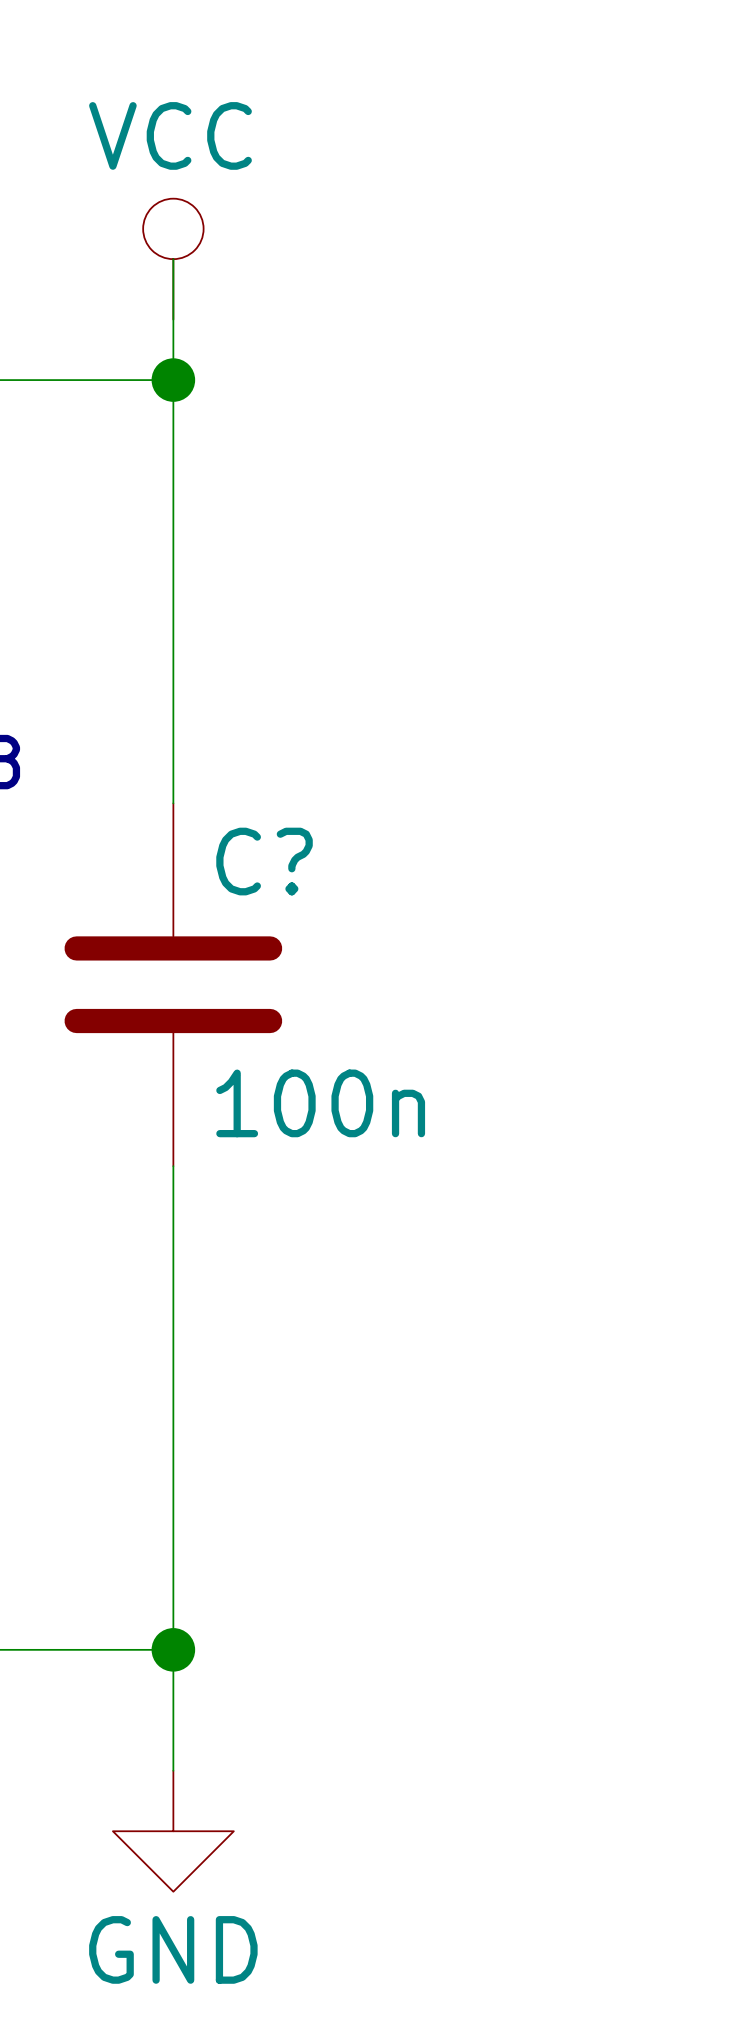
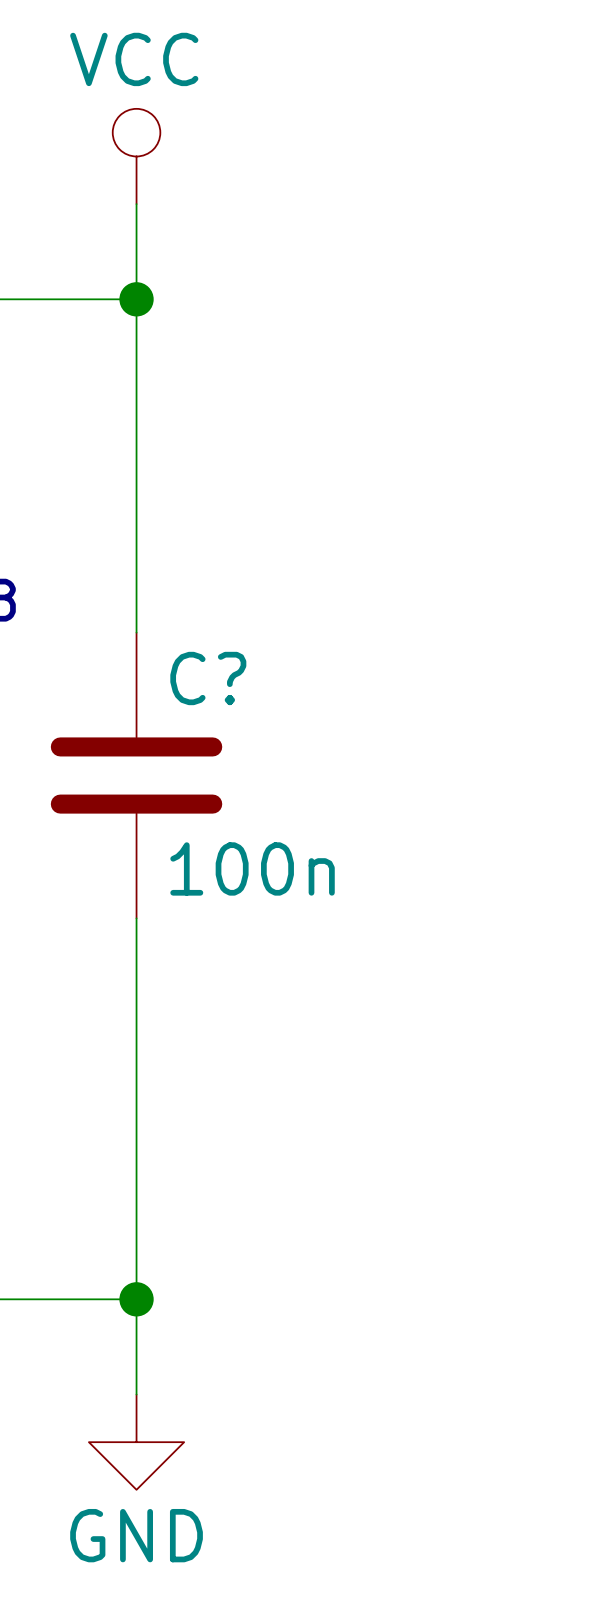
power symbol position: VCC (173, 259) -> VCC (136, 156)

